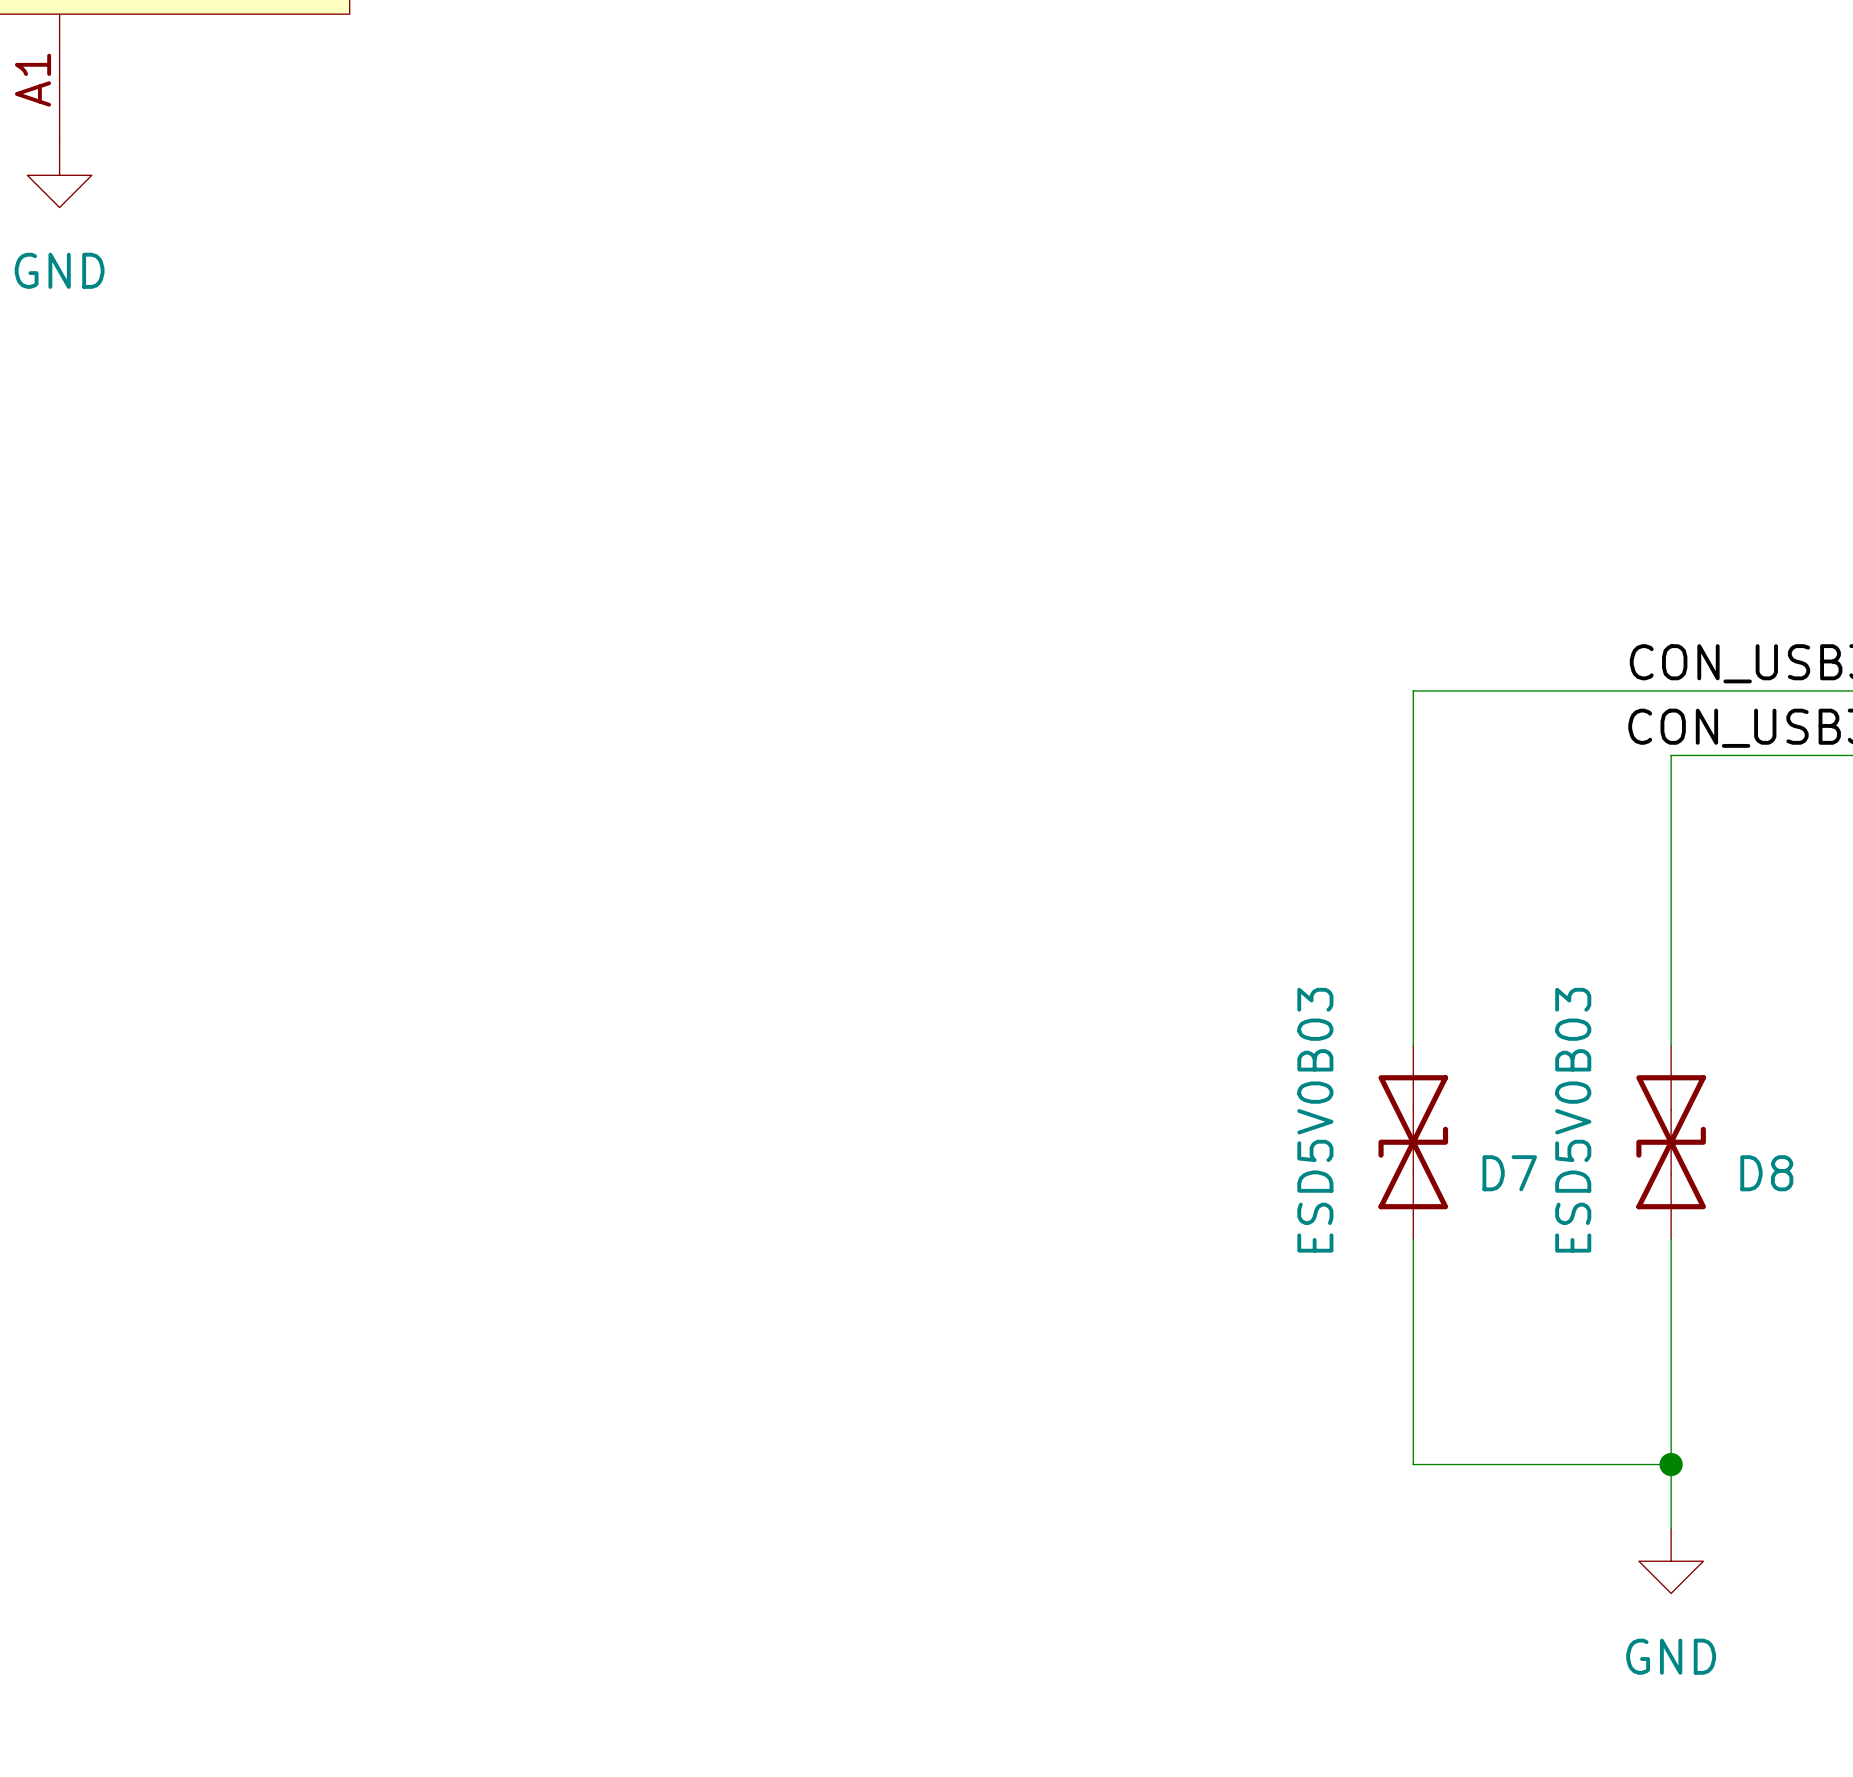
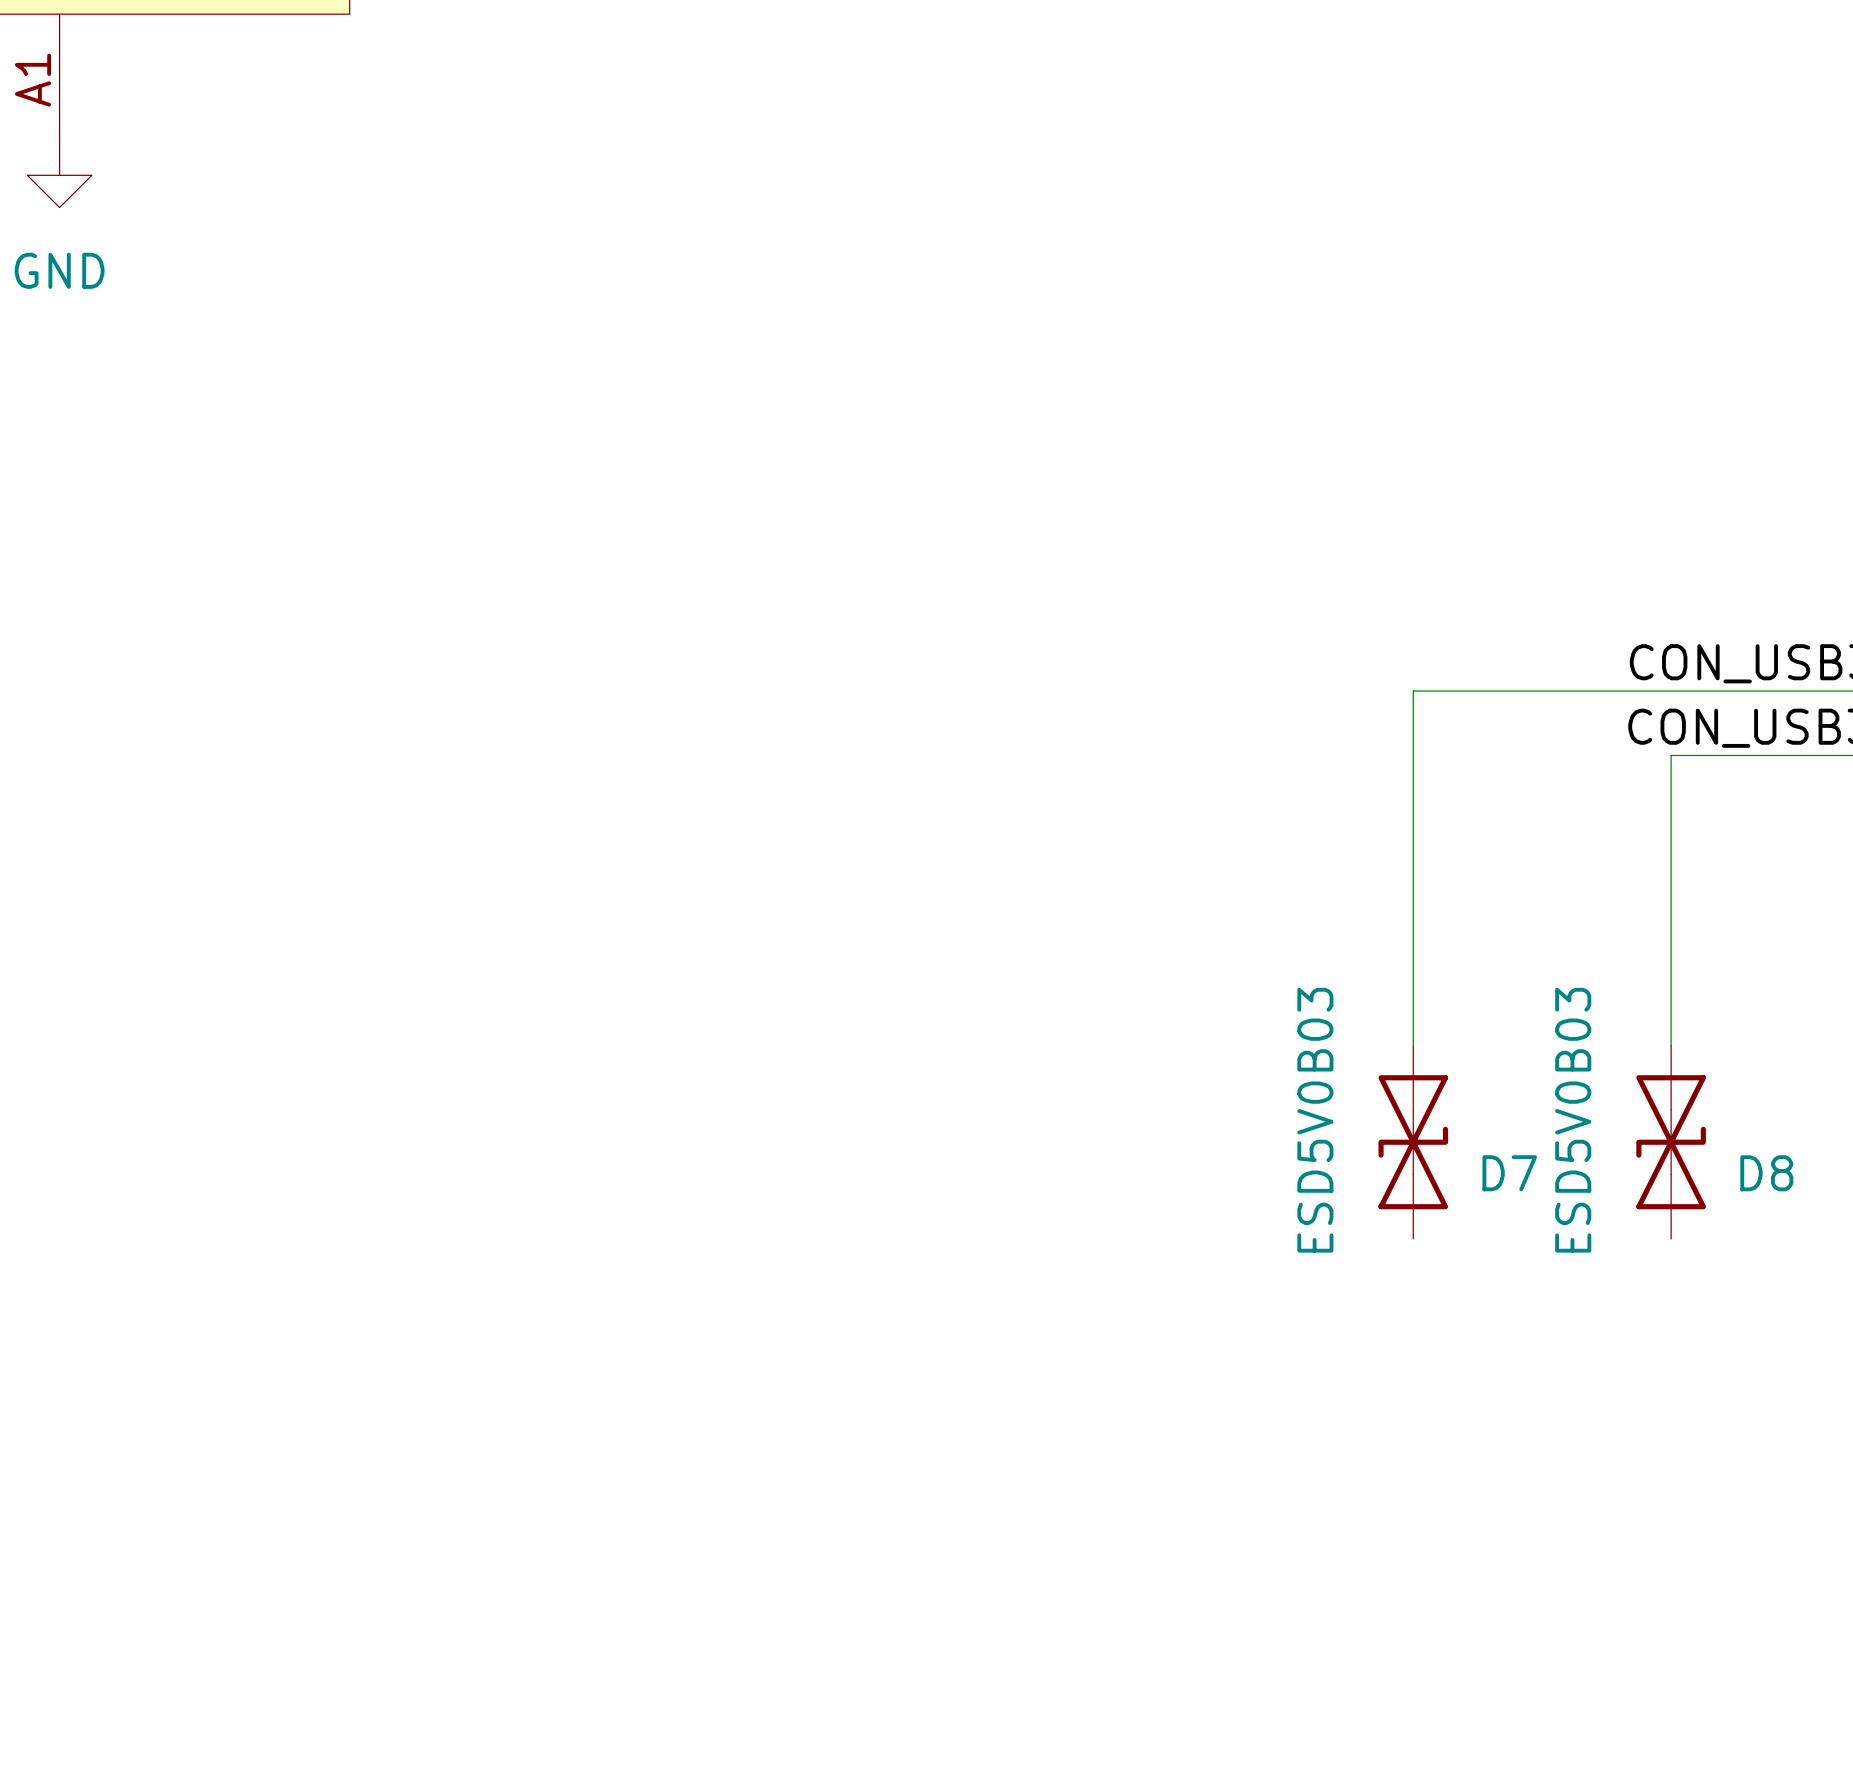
wire: (1413, 1238) (1413, 1464) (1671, 1464) -> none
wire: (1671, 1238) (1671, 1529) -> none
junction: (1671, 1464) -> none
power symbol: GND (1671, 1561) -> none

